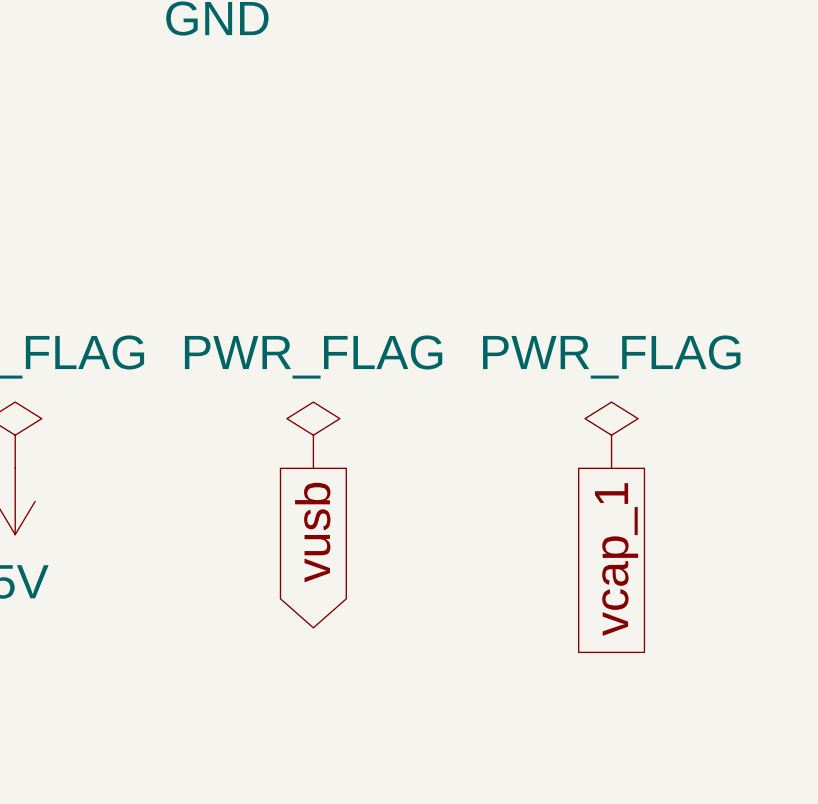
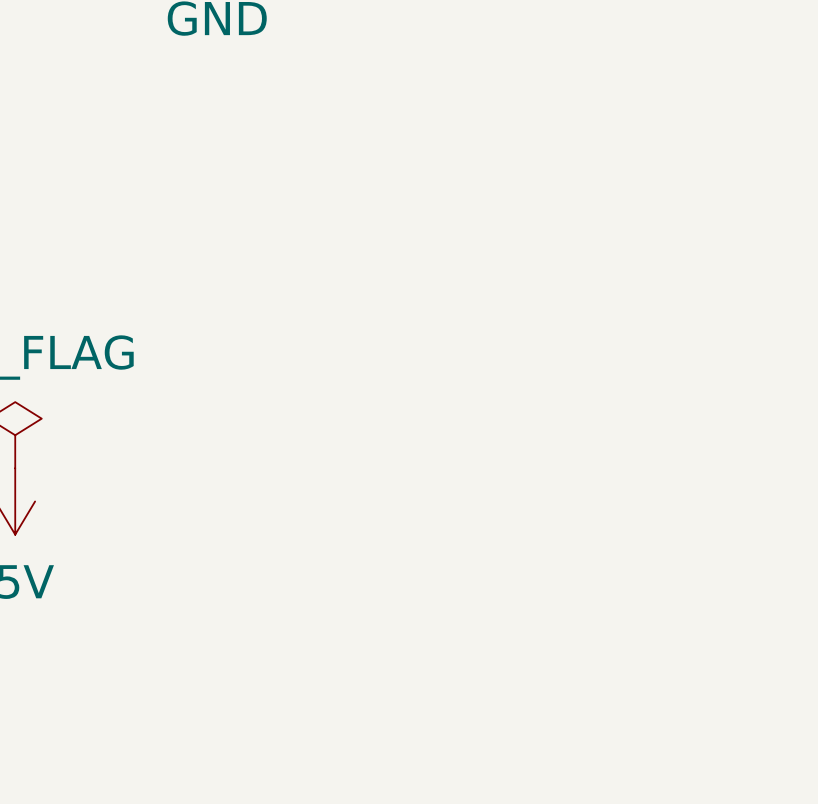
power symbol: PWR_FLAG (313, 435) -> none
power symbol: PWR_FLAG (611, 435) -> none
global label: vusb (312, 532) -> none
global label: vcap_1 (616, 559) -> none

